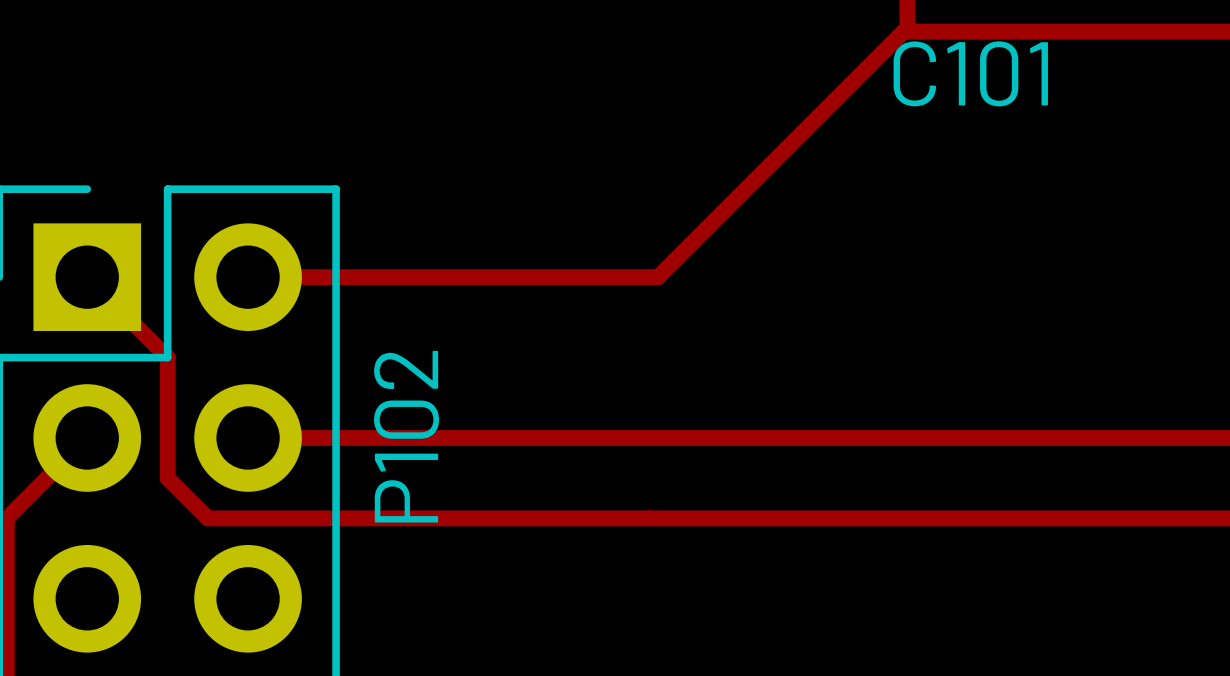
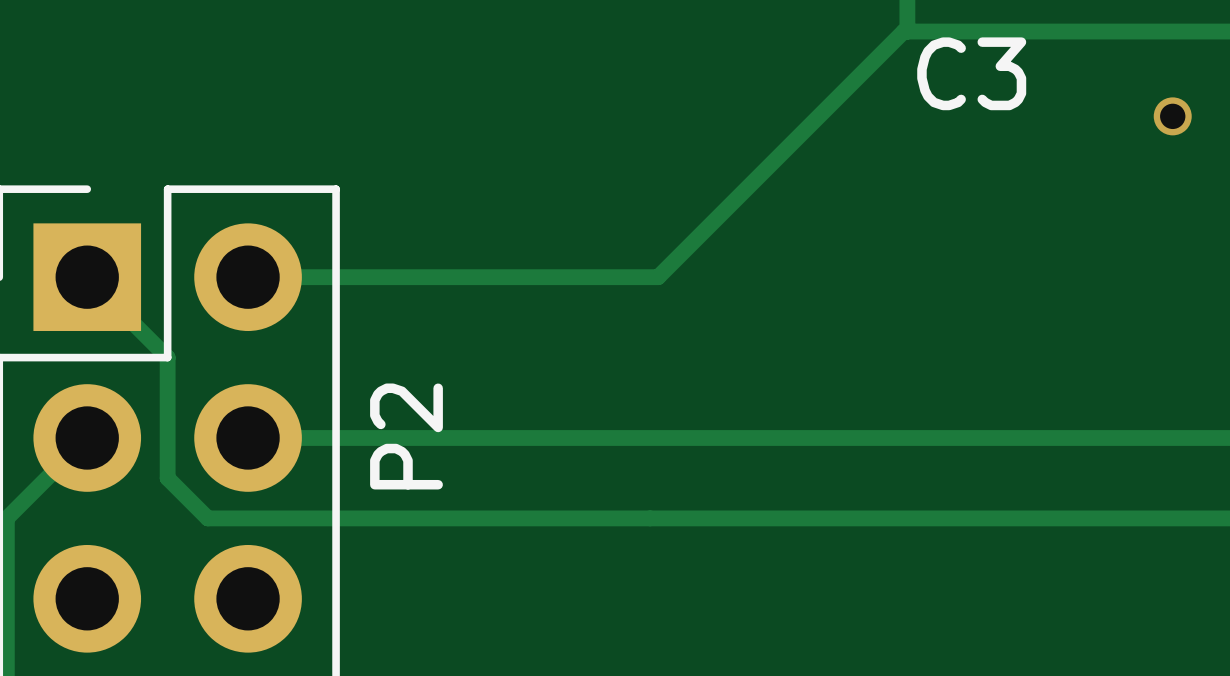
C101 name: C101 (970, 73) -> C3 (971, 73)
via: none -> (1172, 116)
P102 name: P102 (406, 436) -> P2 (406, 436)

